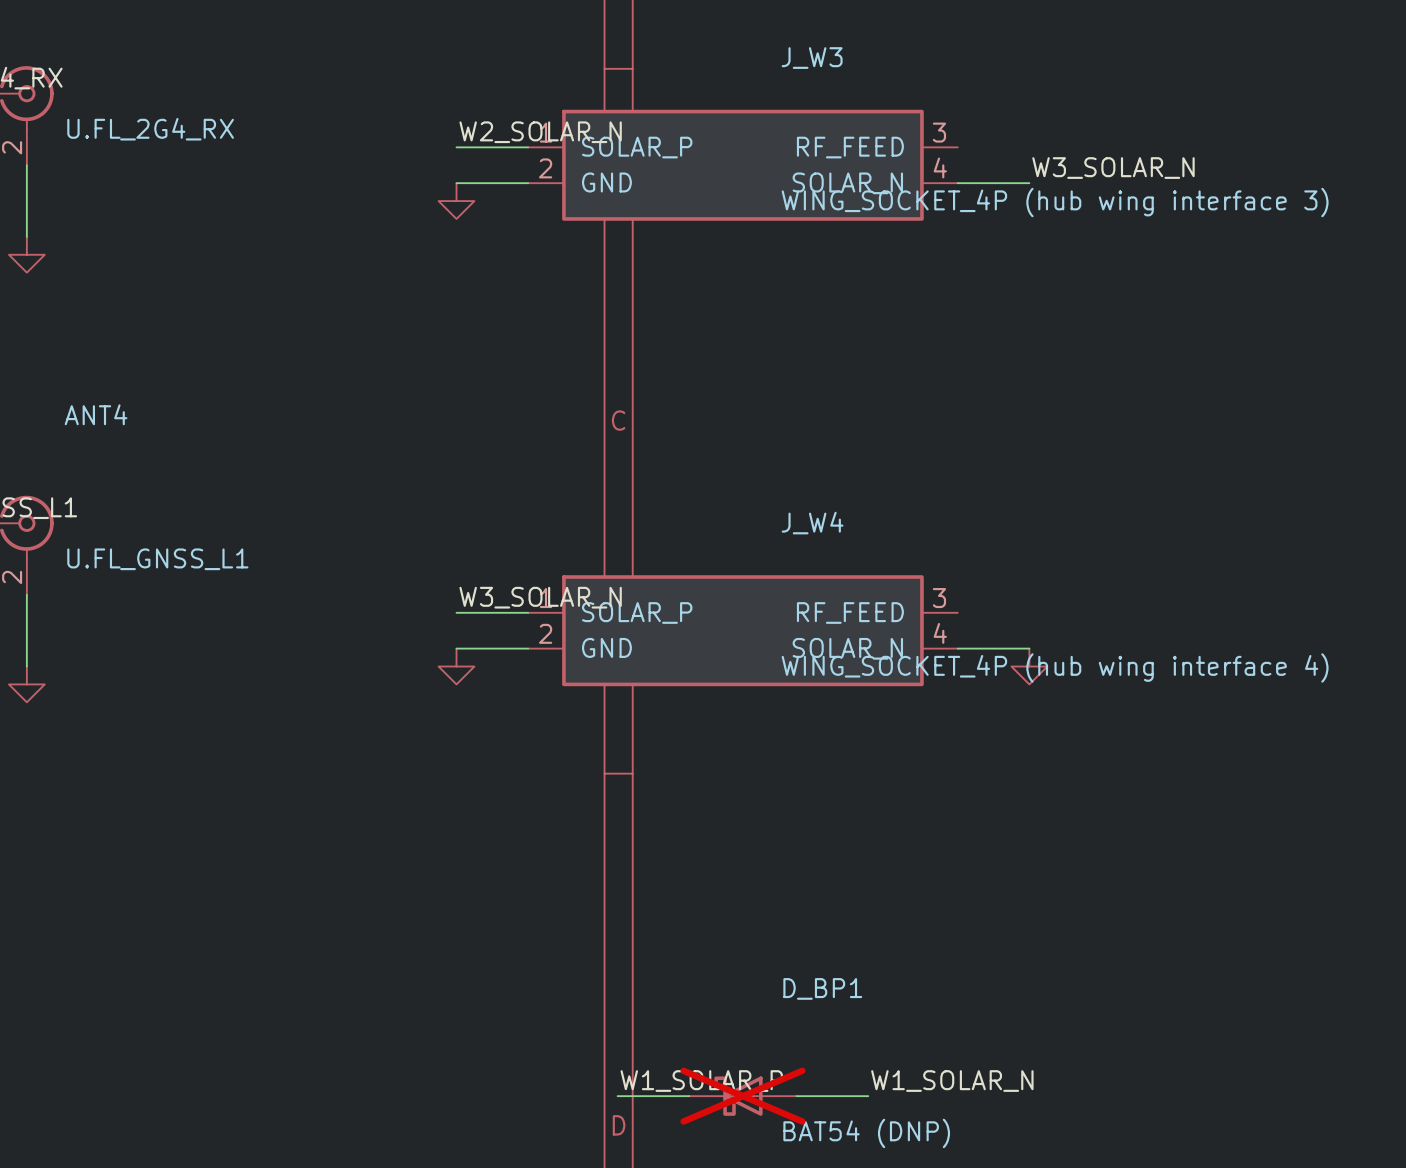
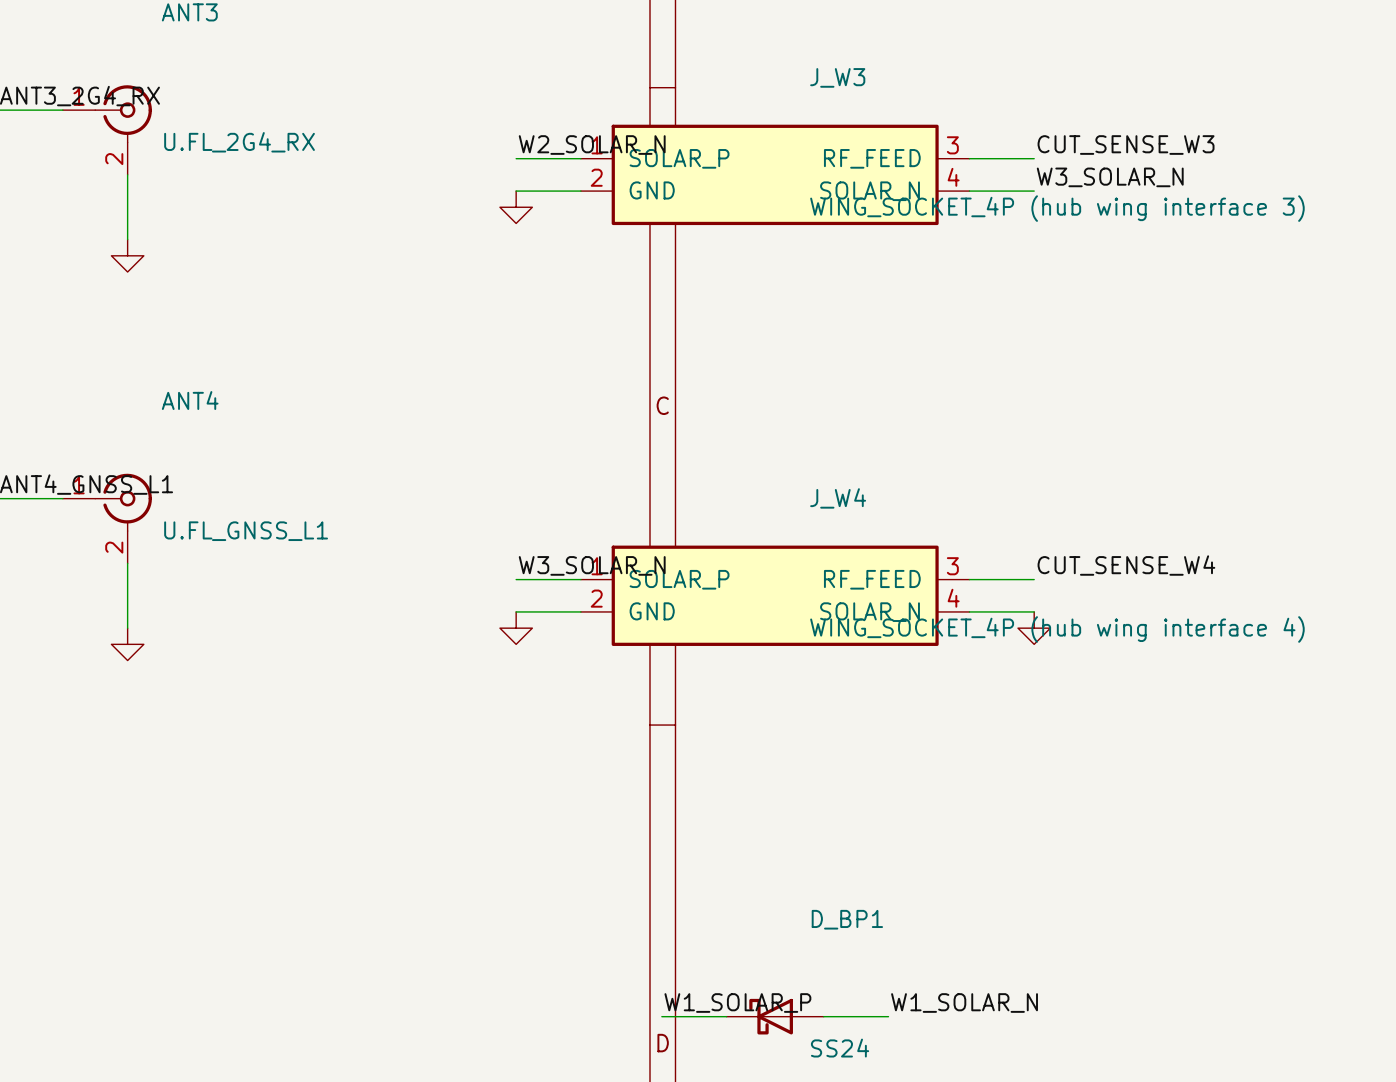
label: none -> CUT_SENSE_W3 (1126, 145)
wire: none -> (969, 158) (1034, 158)
label: none -> CUT_SENSE_W4 (1126, 565)
wire: none -> (969, 579) (1034, 579)
D_BP1 do-not-place cross: (742, 1096) -> none
D_BP1 value: BAT54 (DNP) (866, 1133) -> SS24 (840, 1048)

